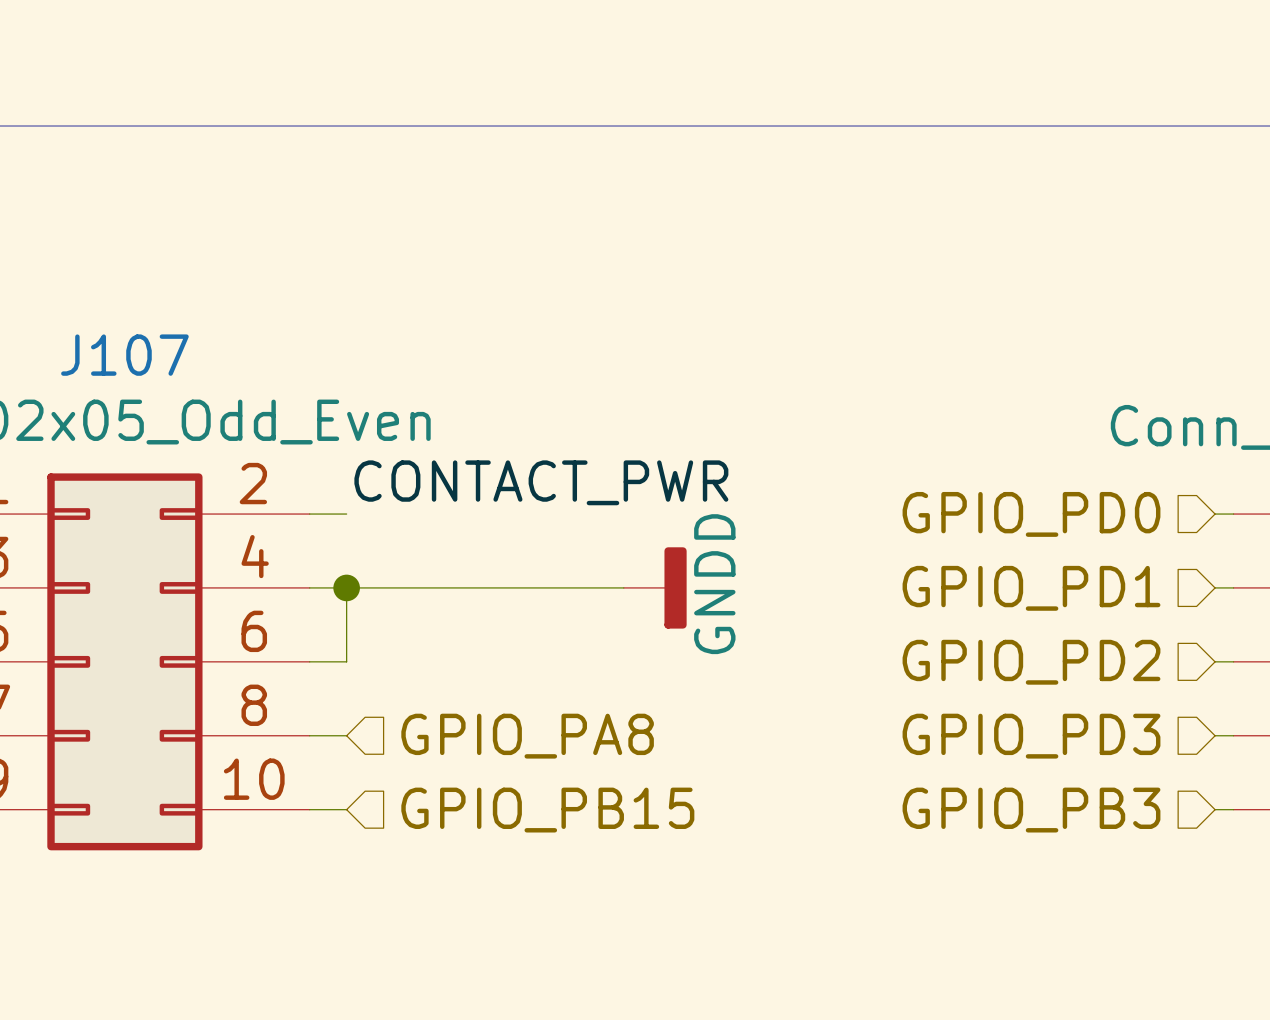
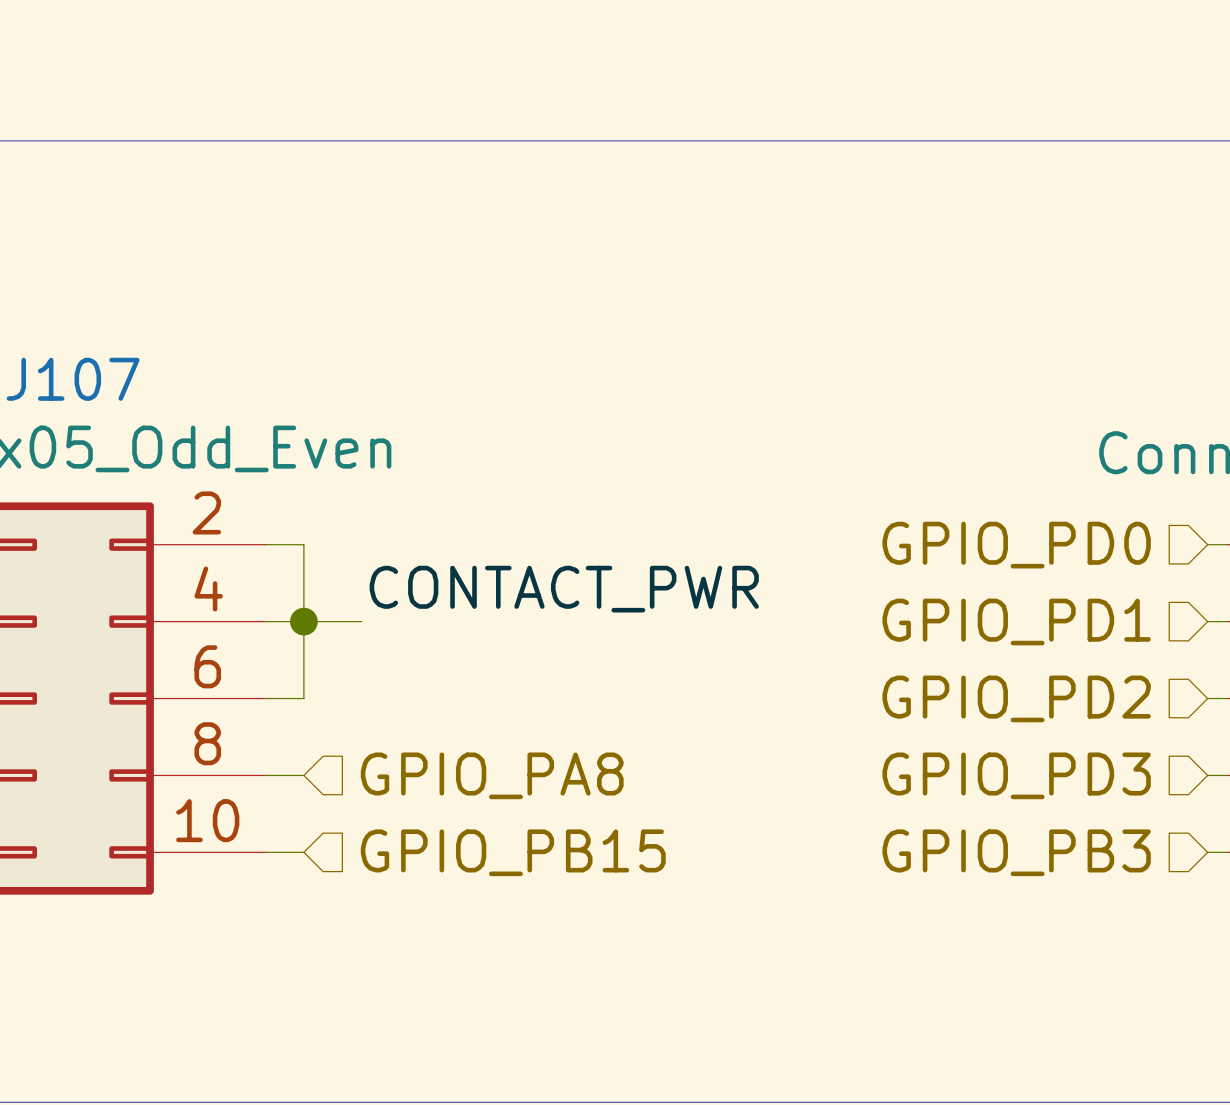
label position: CONTACT_PWR (541, 482) -> CONTACT_PWR (564, 589)
wire: none -> (303, 544) (303, 621)
wire: (402, 587) (623, 587) -> none
power symbol: GNDD (655, 587) -> none

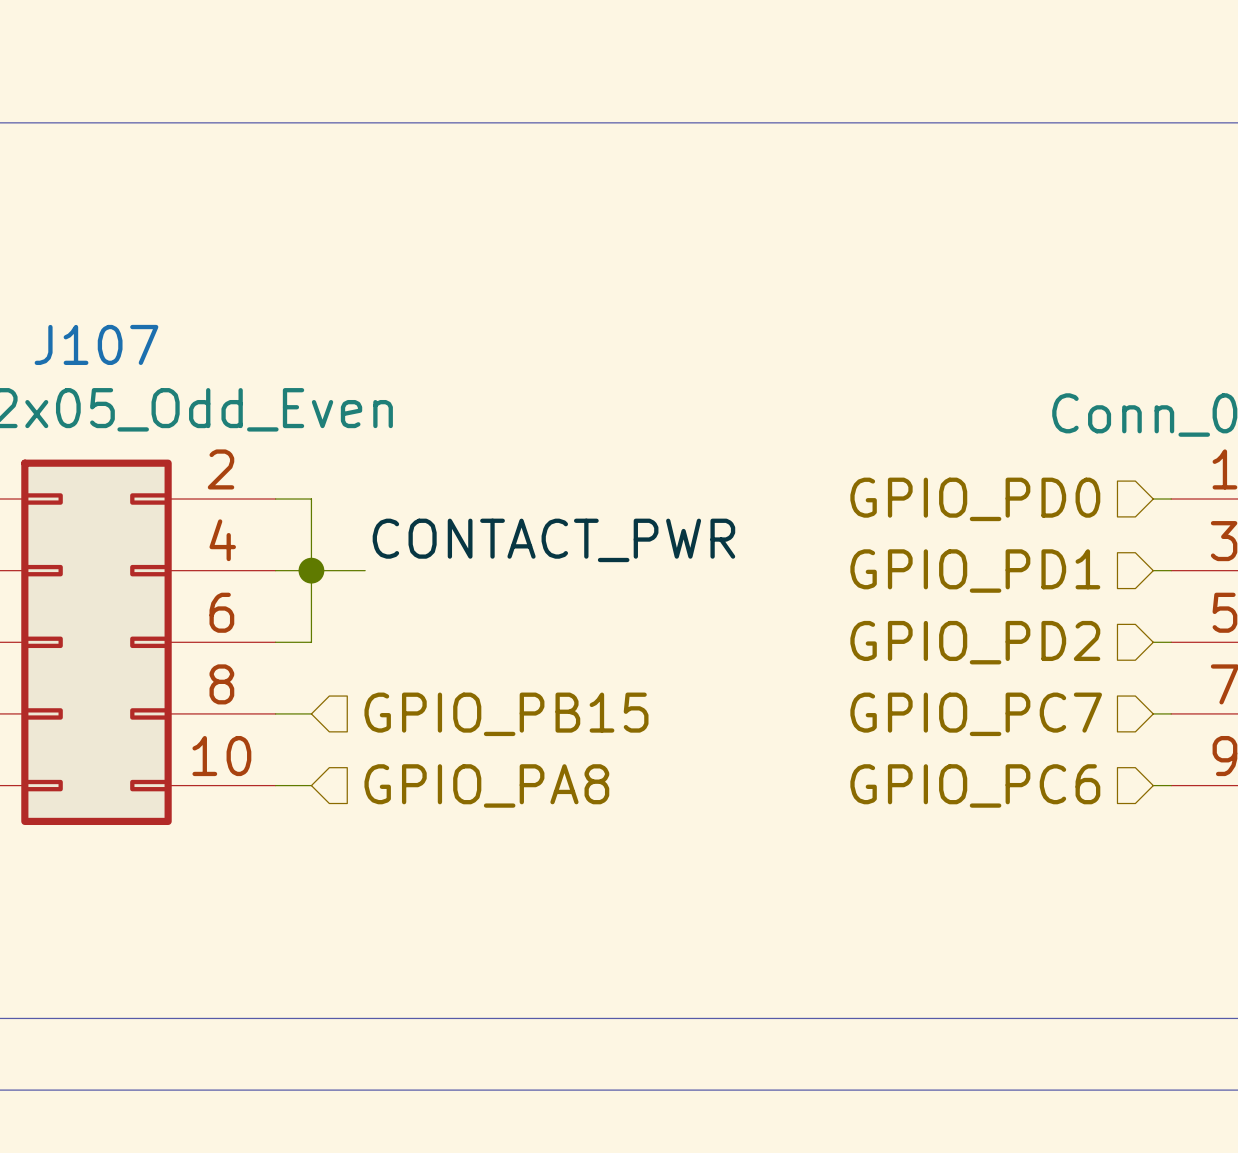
hierarchical label: GPIO_PA8 (492, 775) -> GPIO_PB15 (506, 714)
hierarchical label: GPIO_PD3 (1016, 775) -> GPIO_PC7 (976, 714)
hierarchical label: GPIO_PB15 (513, 852) -> GPIO_PA8 (486, 785)
hierarchical label: GPIO_PB3 (1016, 852) -> GPIO_PC6 (975, 785)

